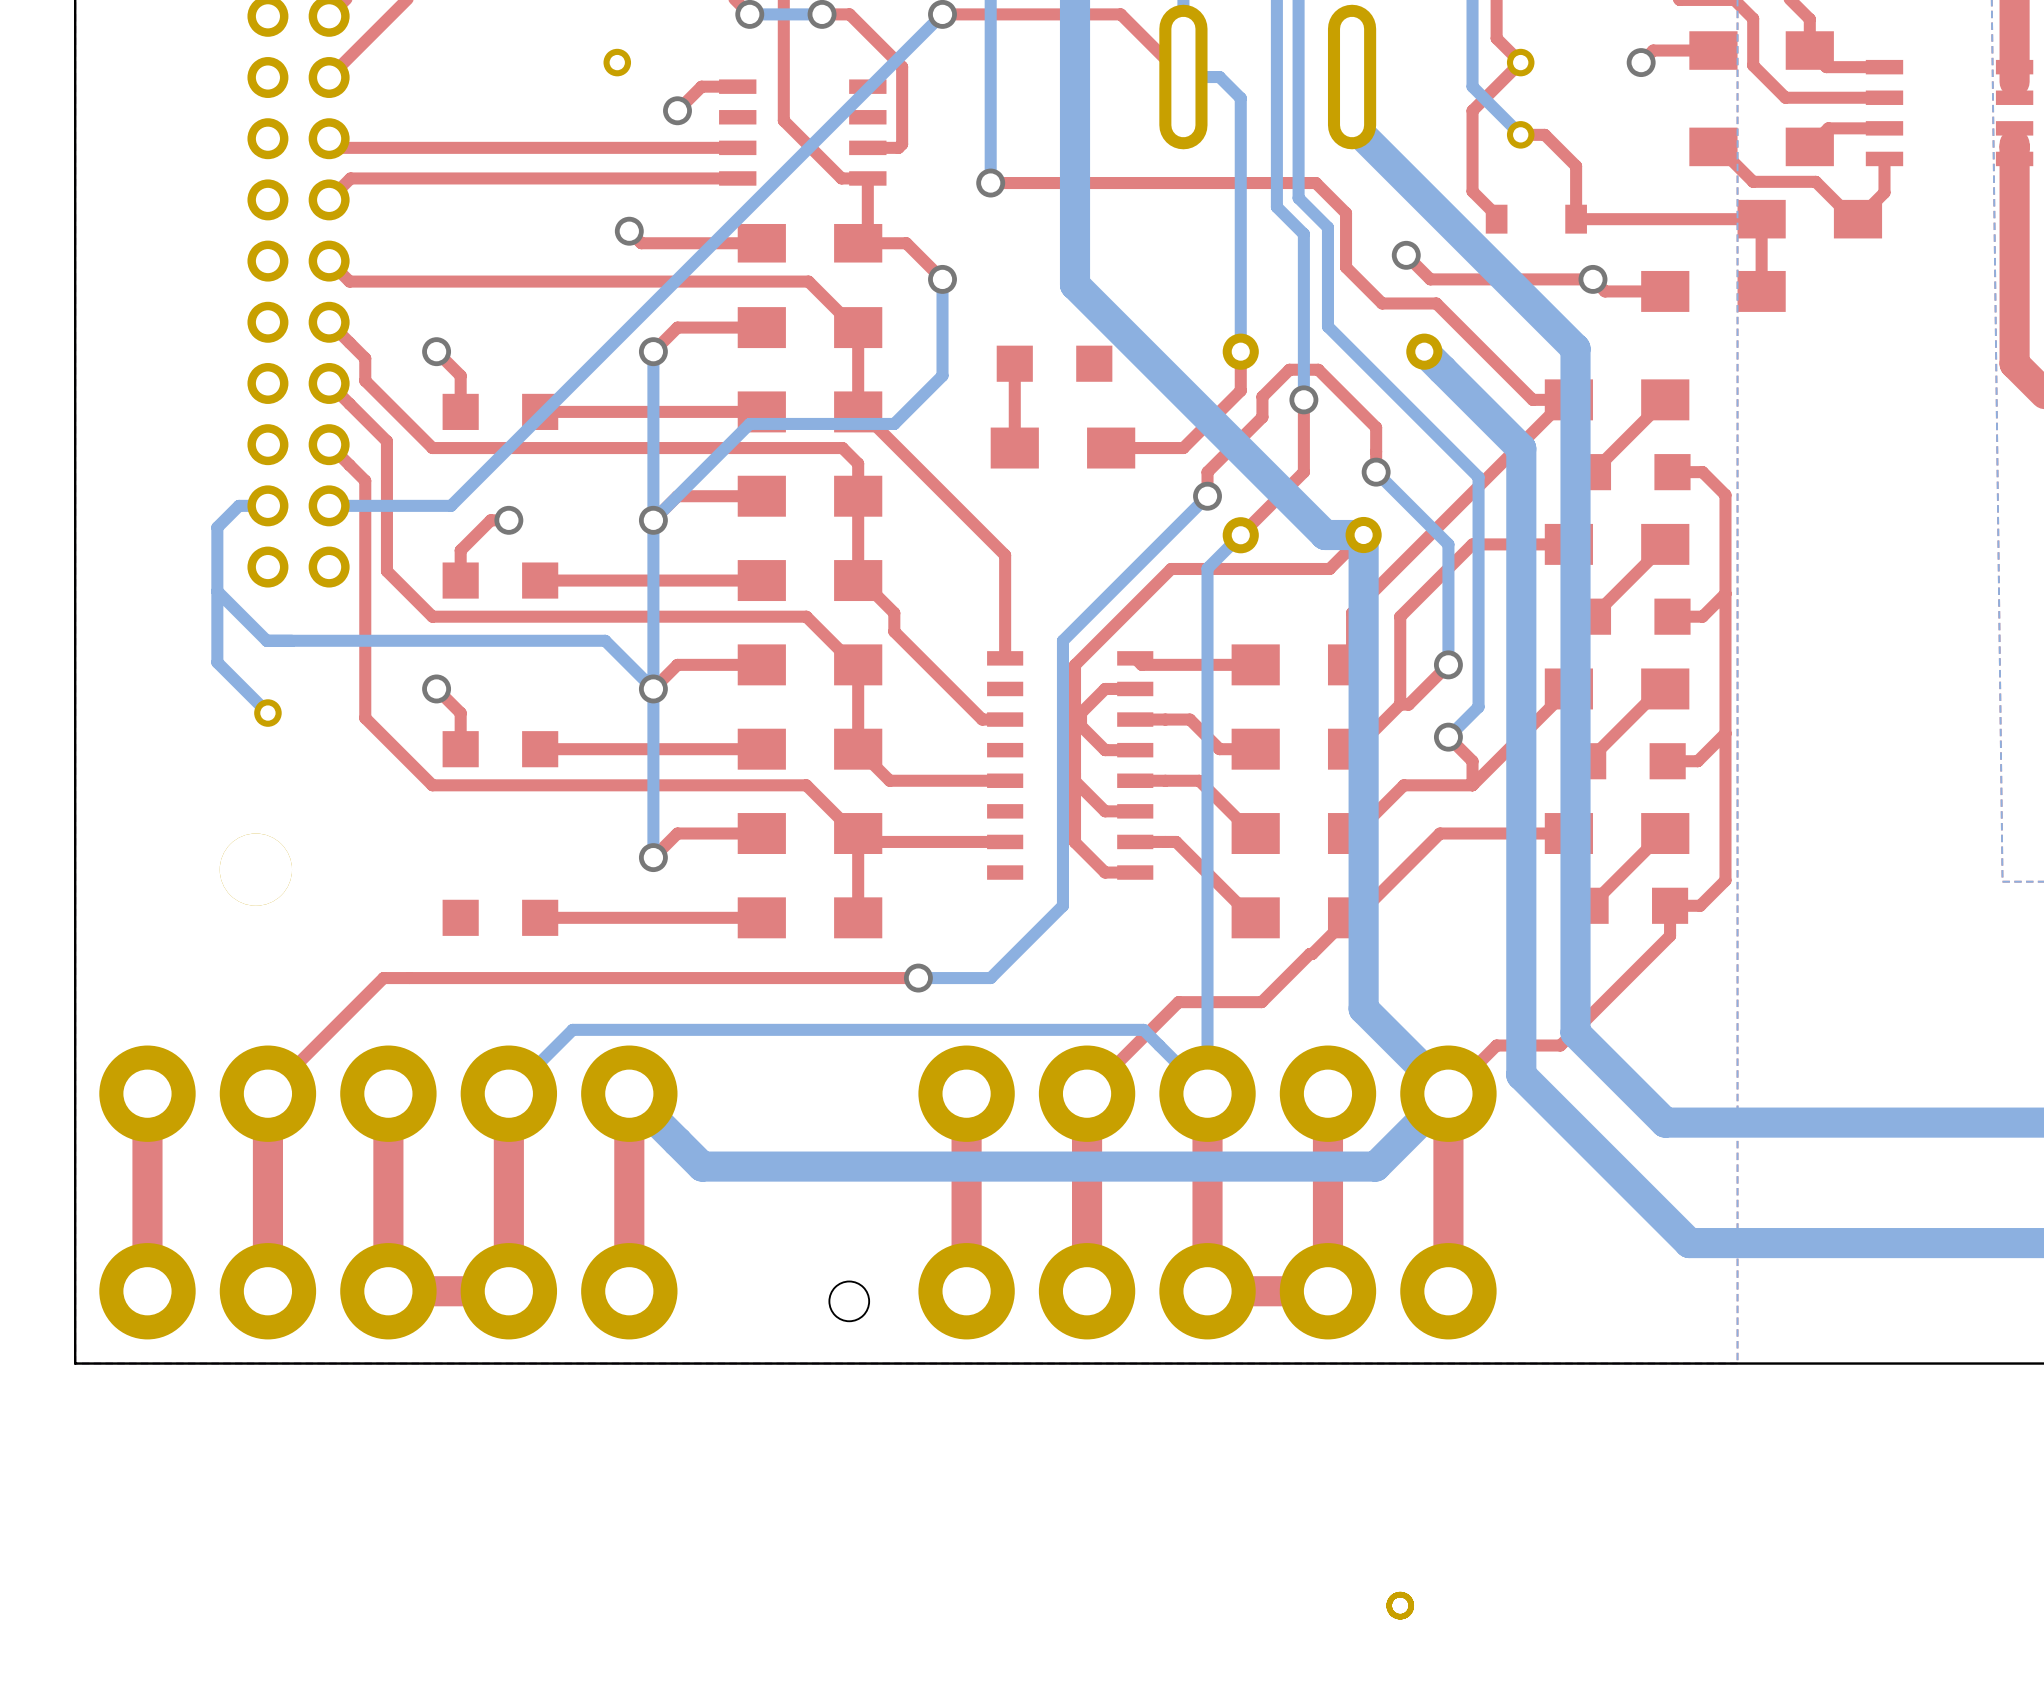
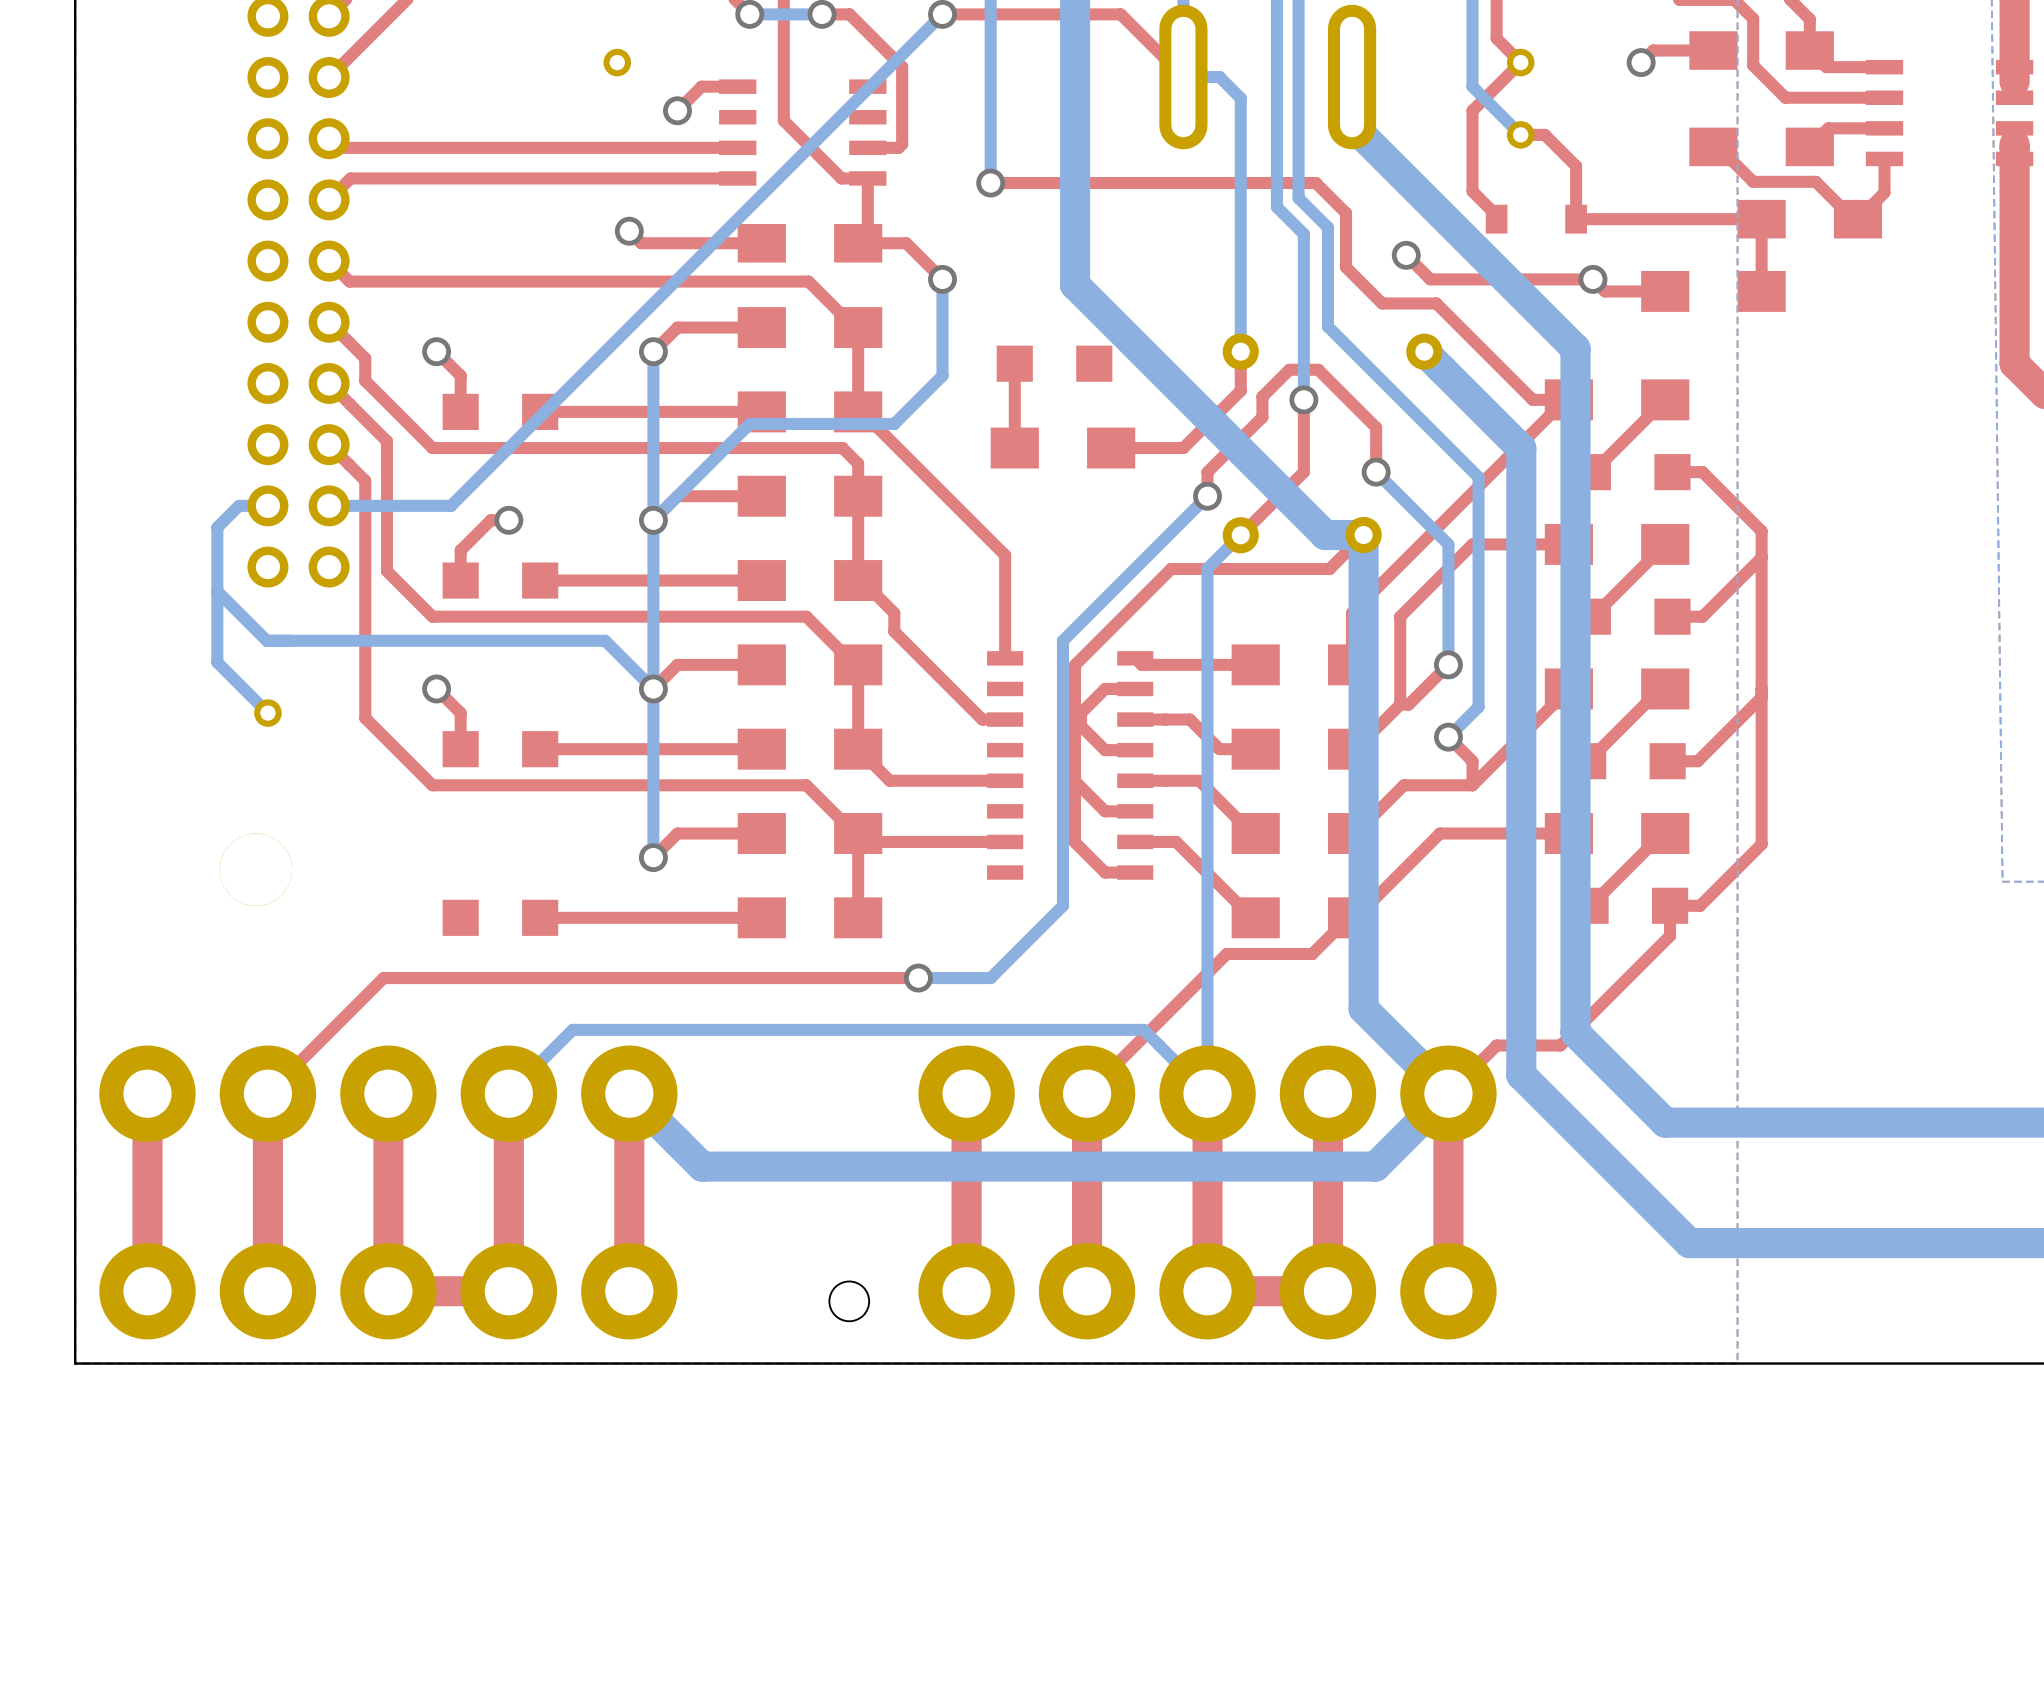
top track: (1725, 495) (1725, 880) -> (1725, 495) (1761, 531) (1761, 844) (1725, 880)
top track: none -> (1761, 557) (1725, 593)
top track: none -> (1761, 697) (1725, 733)
top track: (1309, 953) (1261, 1002) (1178, 1002) -> (1309, 953) (1226, 953) (1178, 1002)
part: (1400, 1605) -> none

